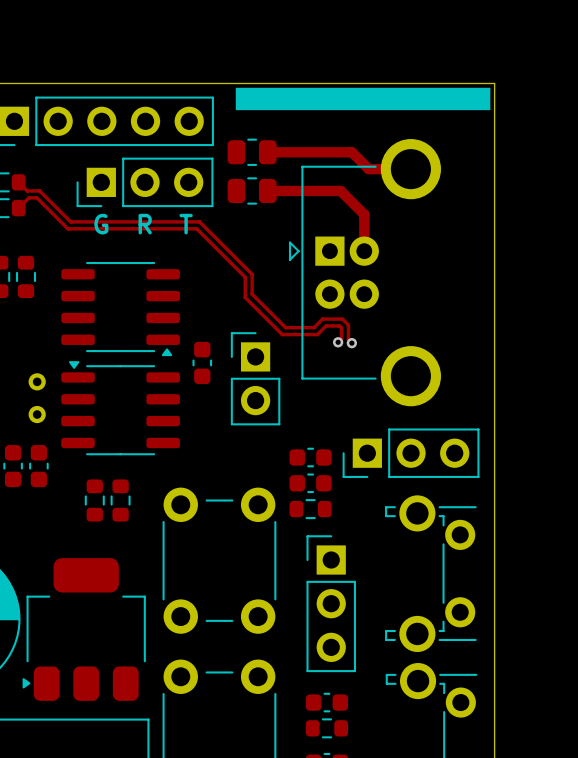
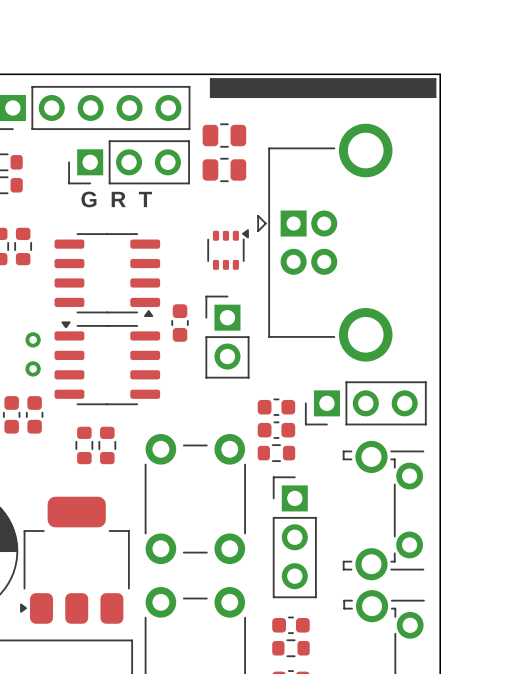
track: (267, 152) (351, 152) (368, 169) (410, 169) -> none
track: (18, 182) (27, 190) (39, 190) (70, 221) (199, 221) (252, 274) (252, 294) (285, 327) (314, 327) (322, 319) (342, 319) (348, 325) (348, 339) (351, 343) -> none
track: (267, 190) (340, 190) (364, 214) (364, 251) -> none
track: (18, 208) (29, 197) (36, 197) (67, 228) (196, 228) (245, 277) (245, 297) (282, 334) (317, 334) (326, 325) (339, 325) (341, 327) (341, 338) (338, 342) (336, 339) -> none
part: none -> (228, 249)
via: (338, 342) -> none
via: (351, 343) -> none

